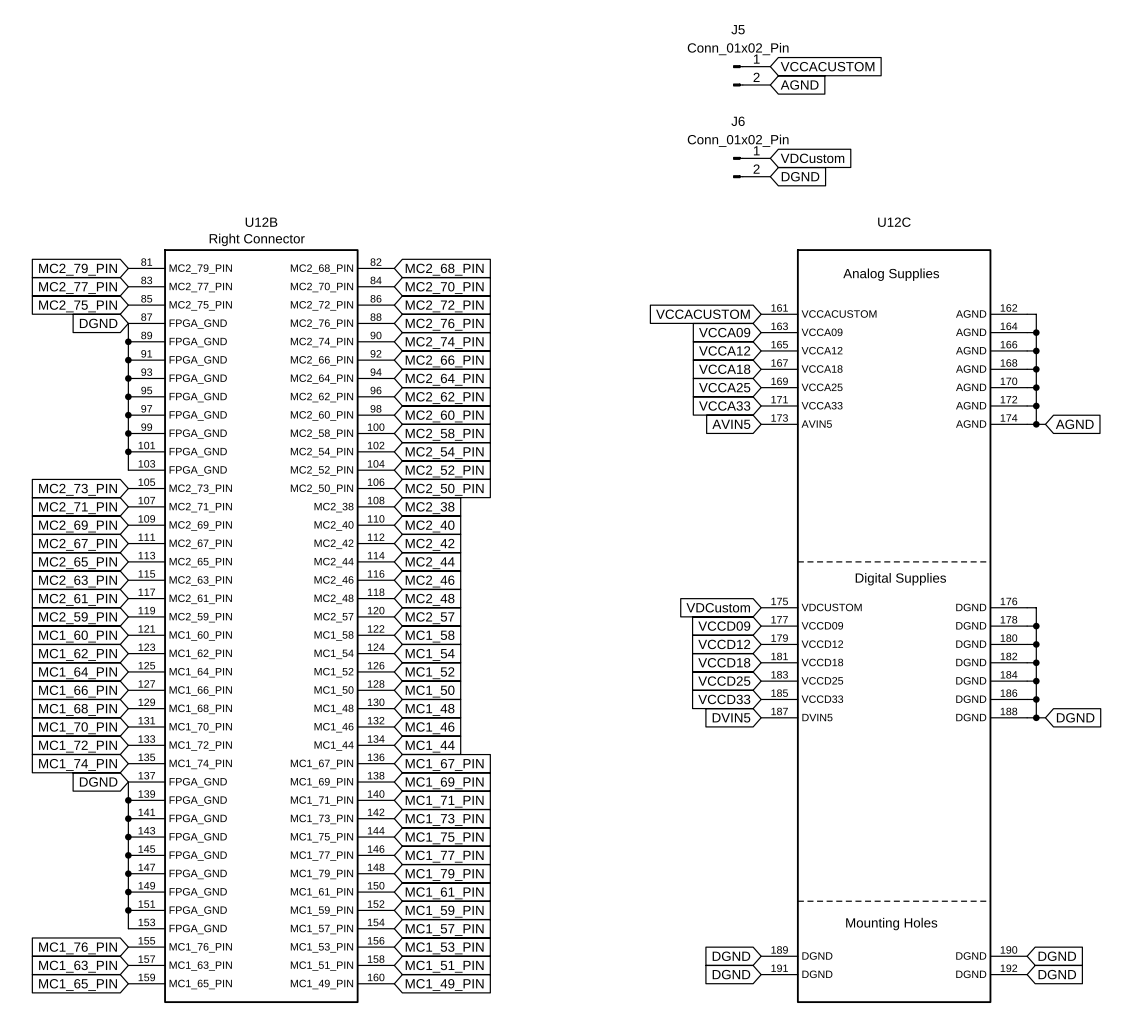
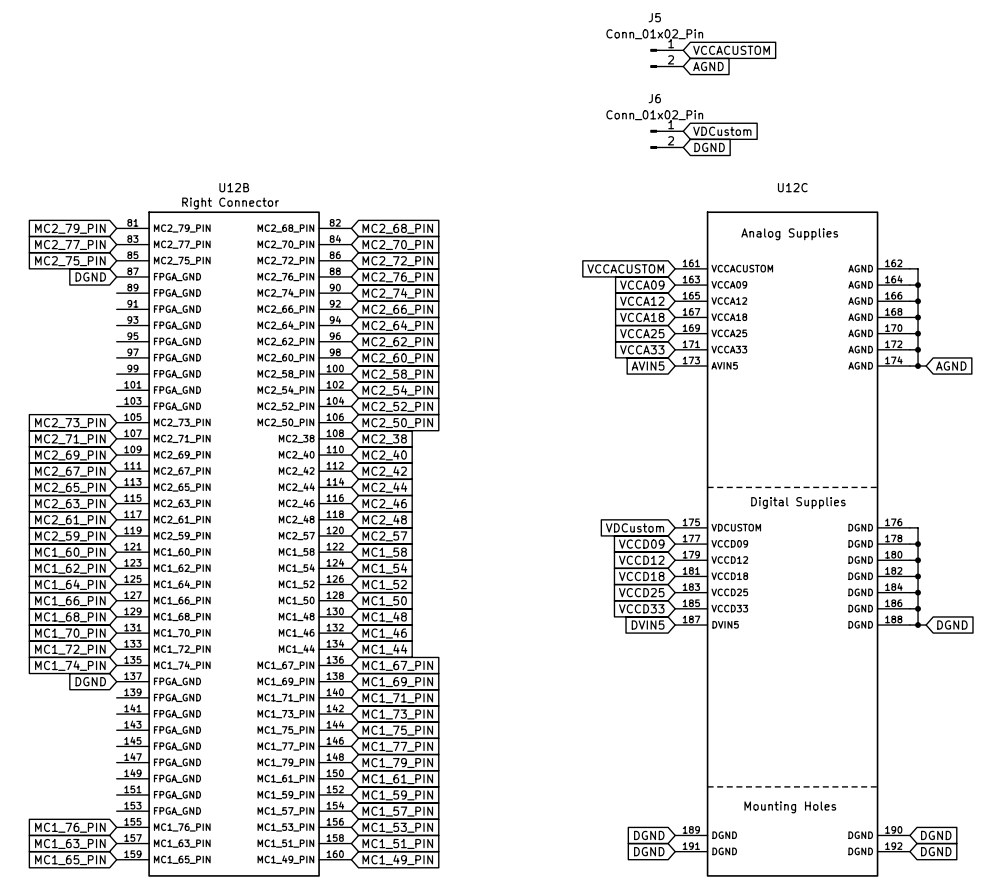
wire: (128, 323) (128, 470) -> none
junction: (128, 341) -> none
junction: (128, 360) -> none
junction: (128, 378) -> none
junction: (128, 396) -> none
junction: (128, 415) -> none
junction: (128, 433) -> none
junction: (128, 451) -> none
wire: (128, 782) (128, 928) -> none
junction: (128, 800) -> none
junction: (128, 818) -> none
junction: (128, 837) -> none
junction: (128, 855) -> none
junction: (128, 873) -> none
junction: (128, 892) -> none
junction: (128, 910) -> none

